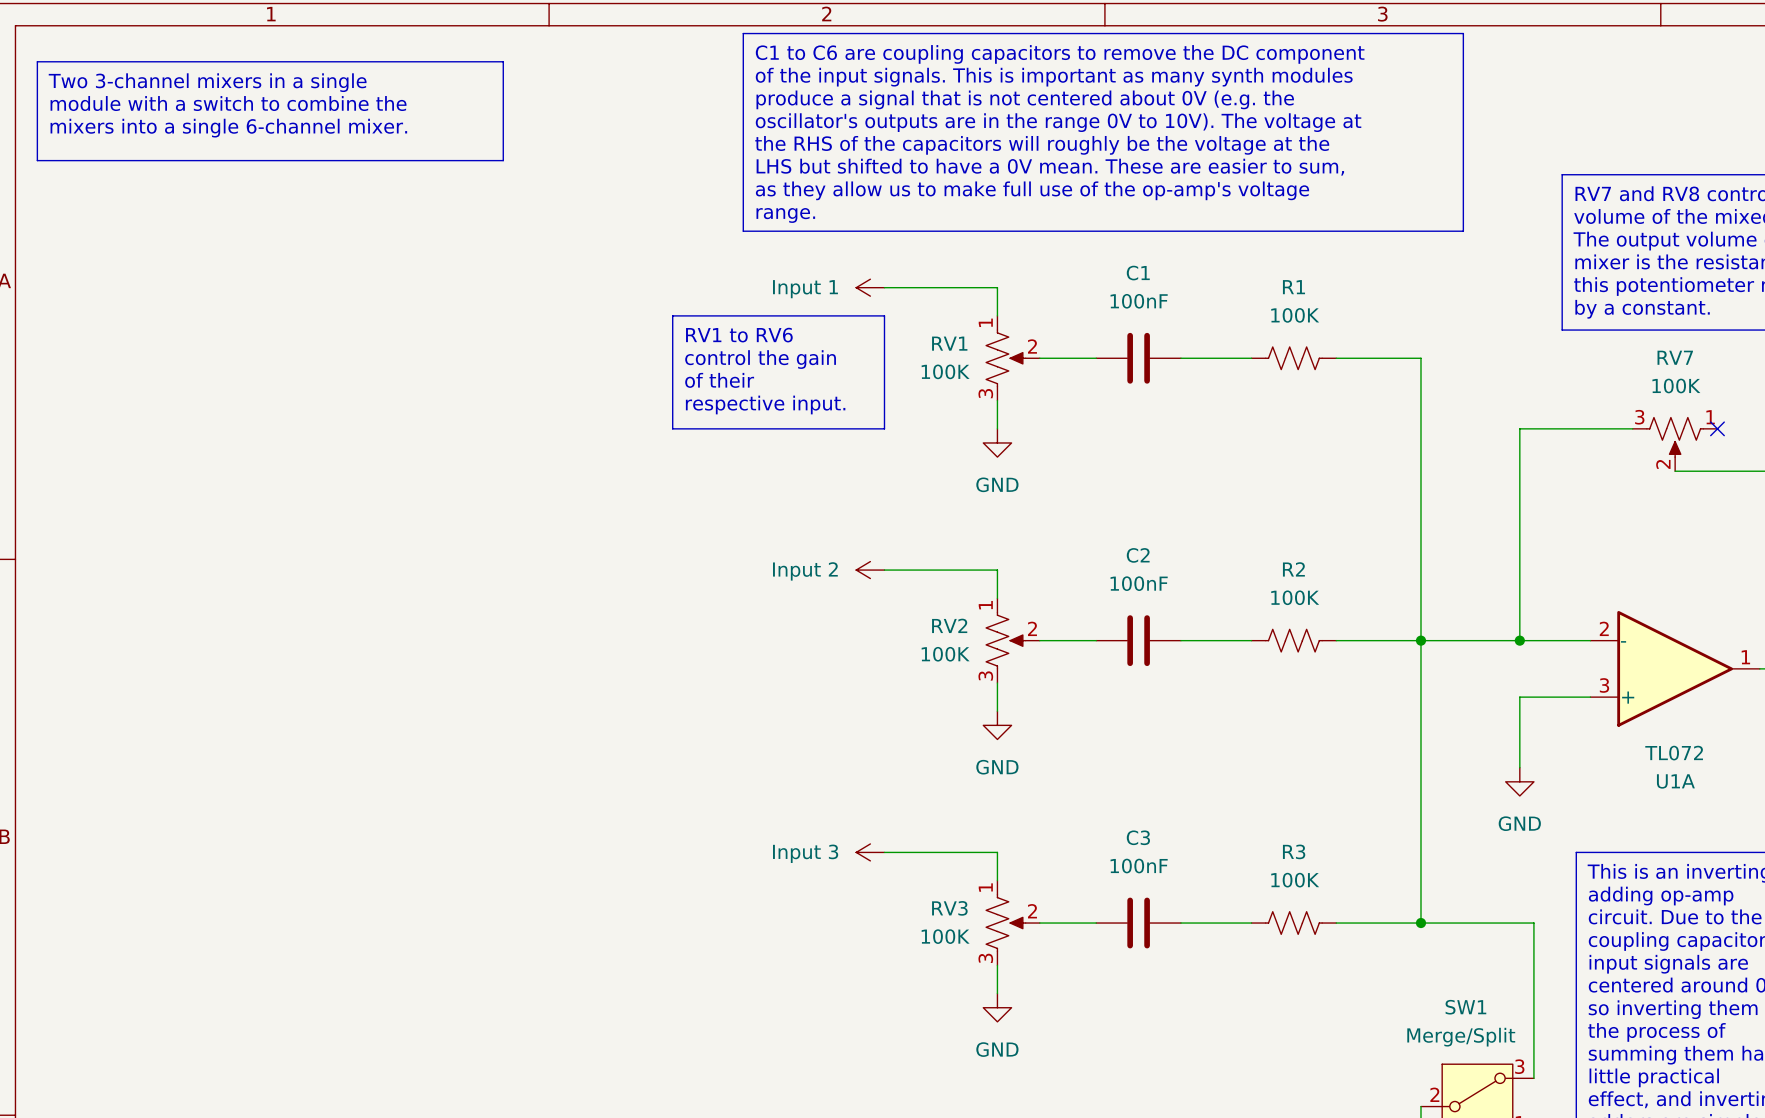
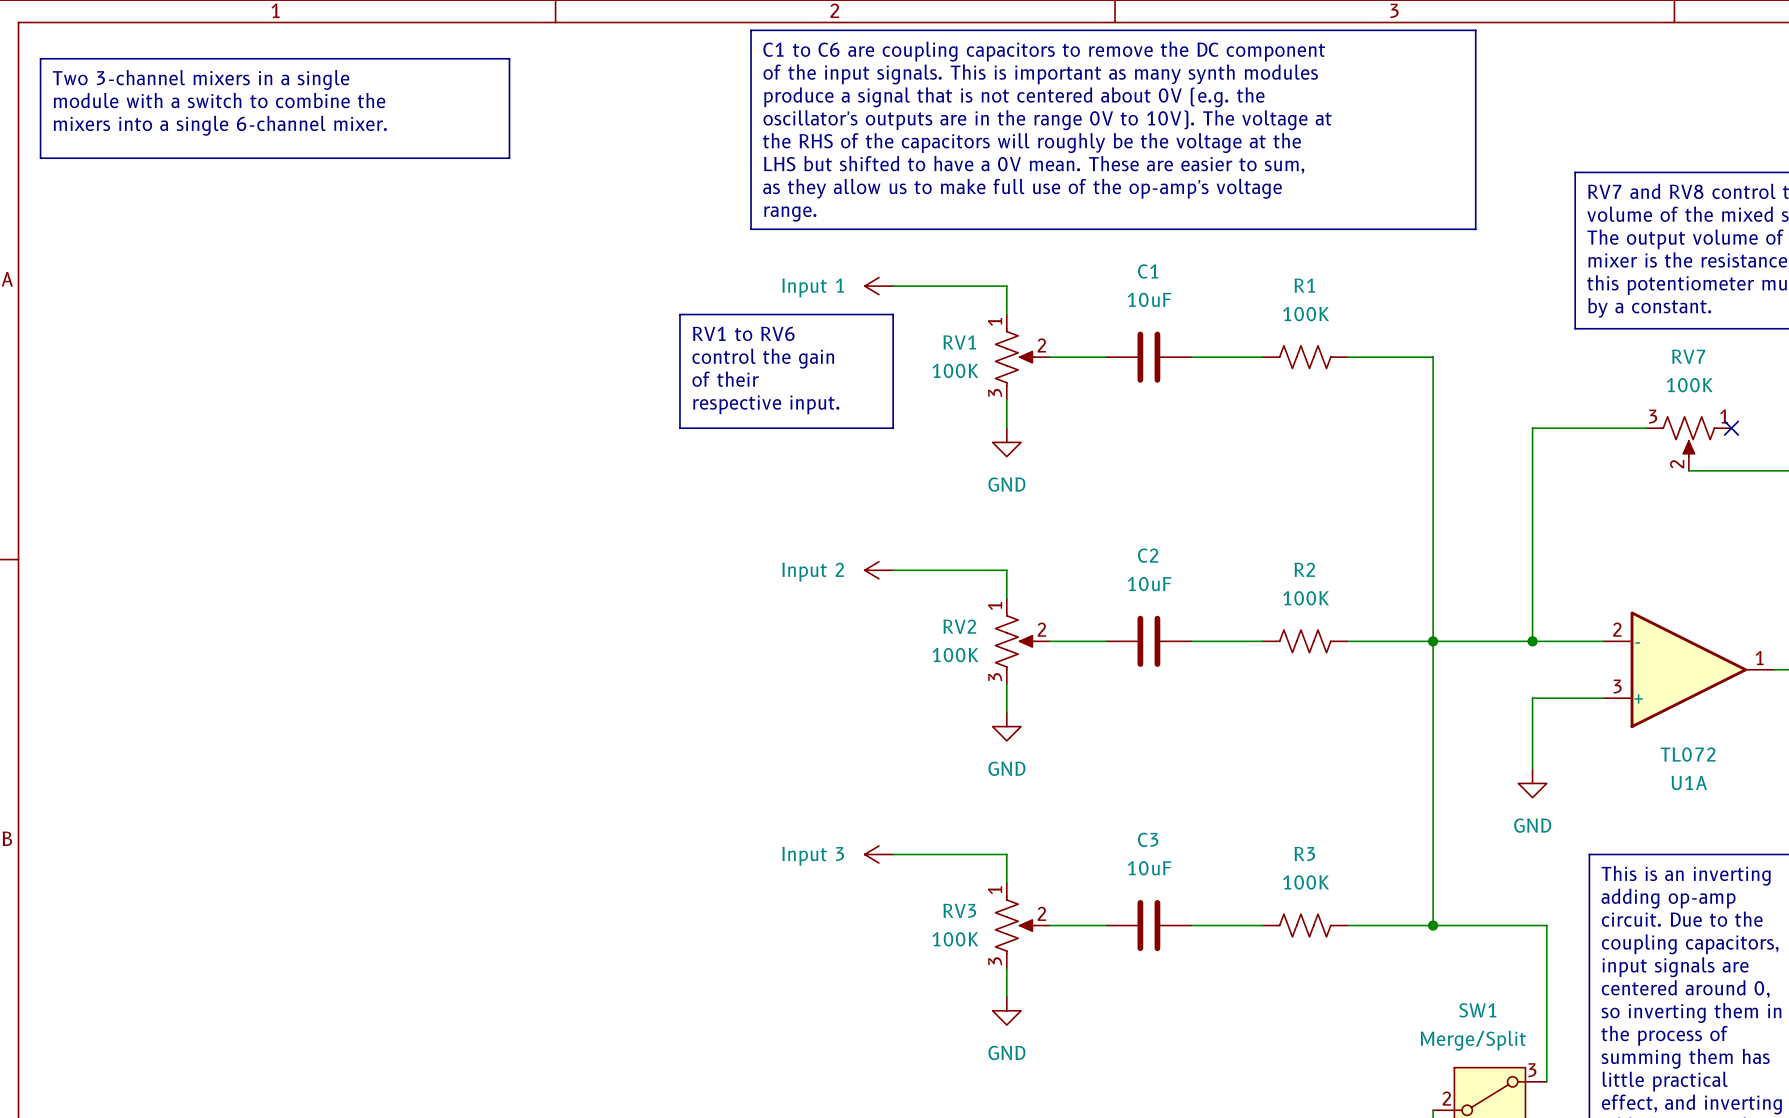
C1 value: 100nF (1139, 301) -> 10uF (1149, 299)
C2 value: 100nF (1139, 583) -> 10uF (1149, 584)
C3 value: 100nF (1139, 866) -> 10uF (1149, 868)

